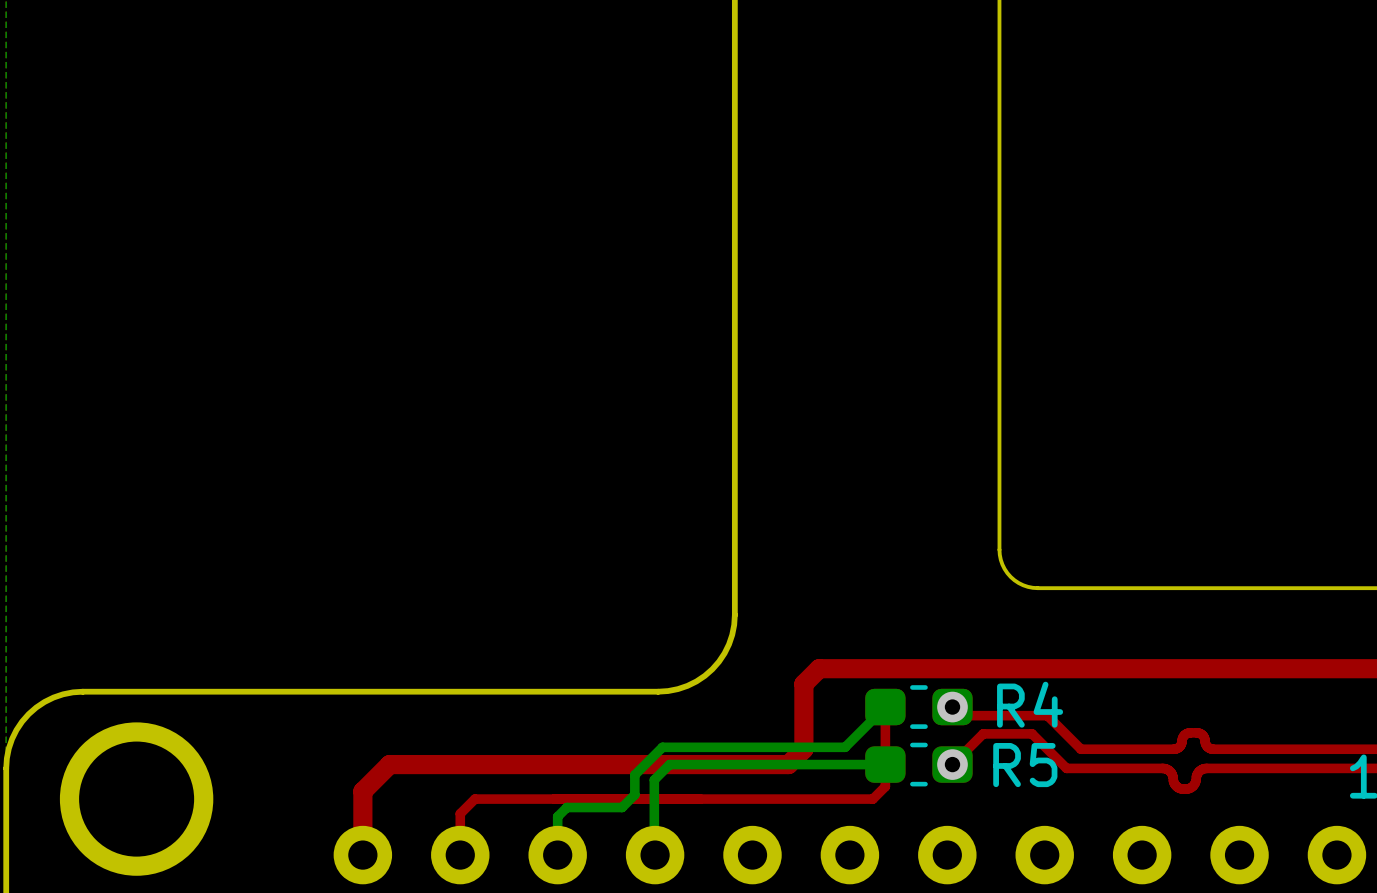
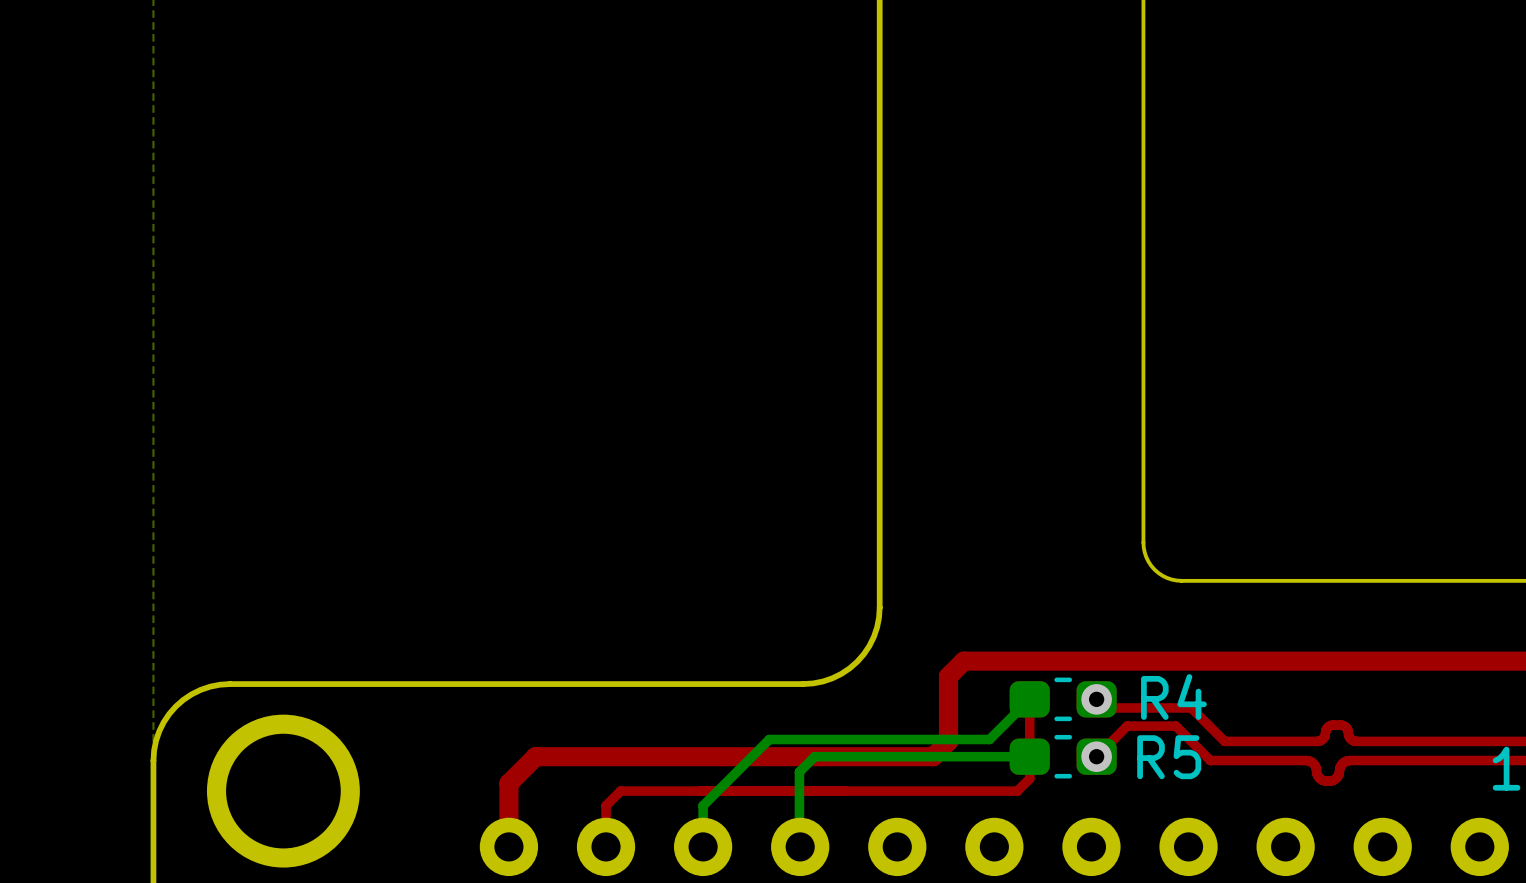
bottom track: (662, 747) (634, 774) (634, 794) (622, 807) (566, 807) (557, 816) -> (807, 739) (769, 739) (703, 805) (703, 808)

